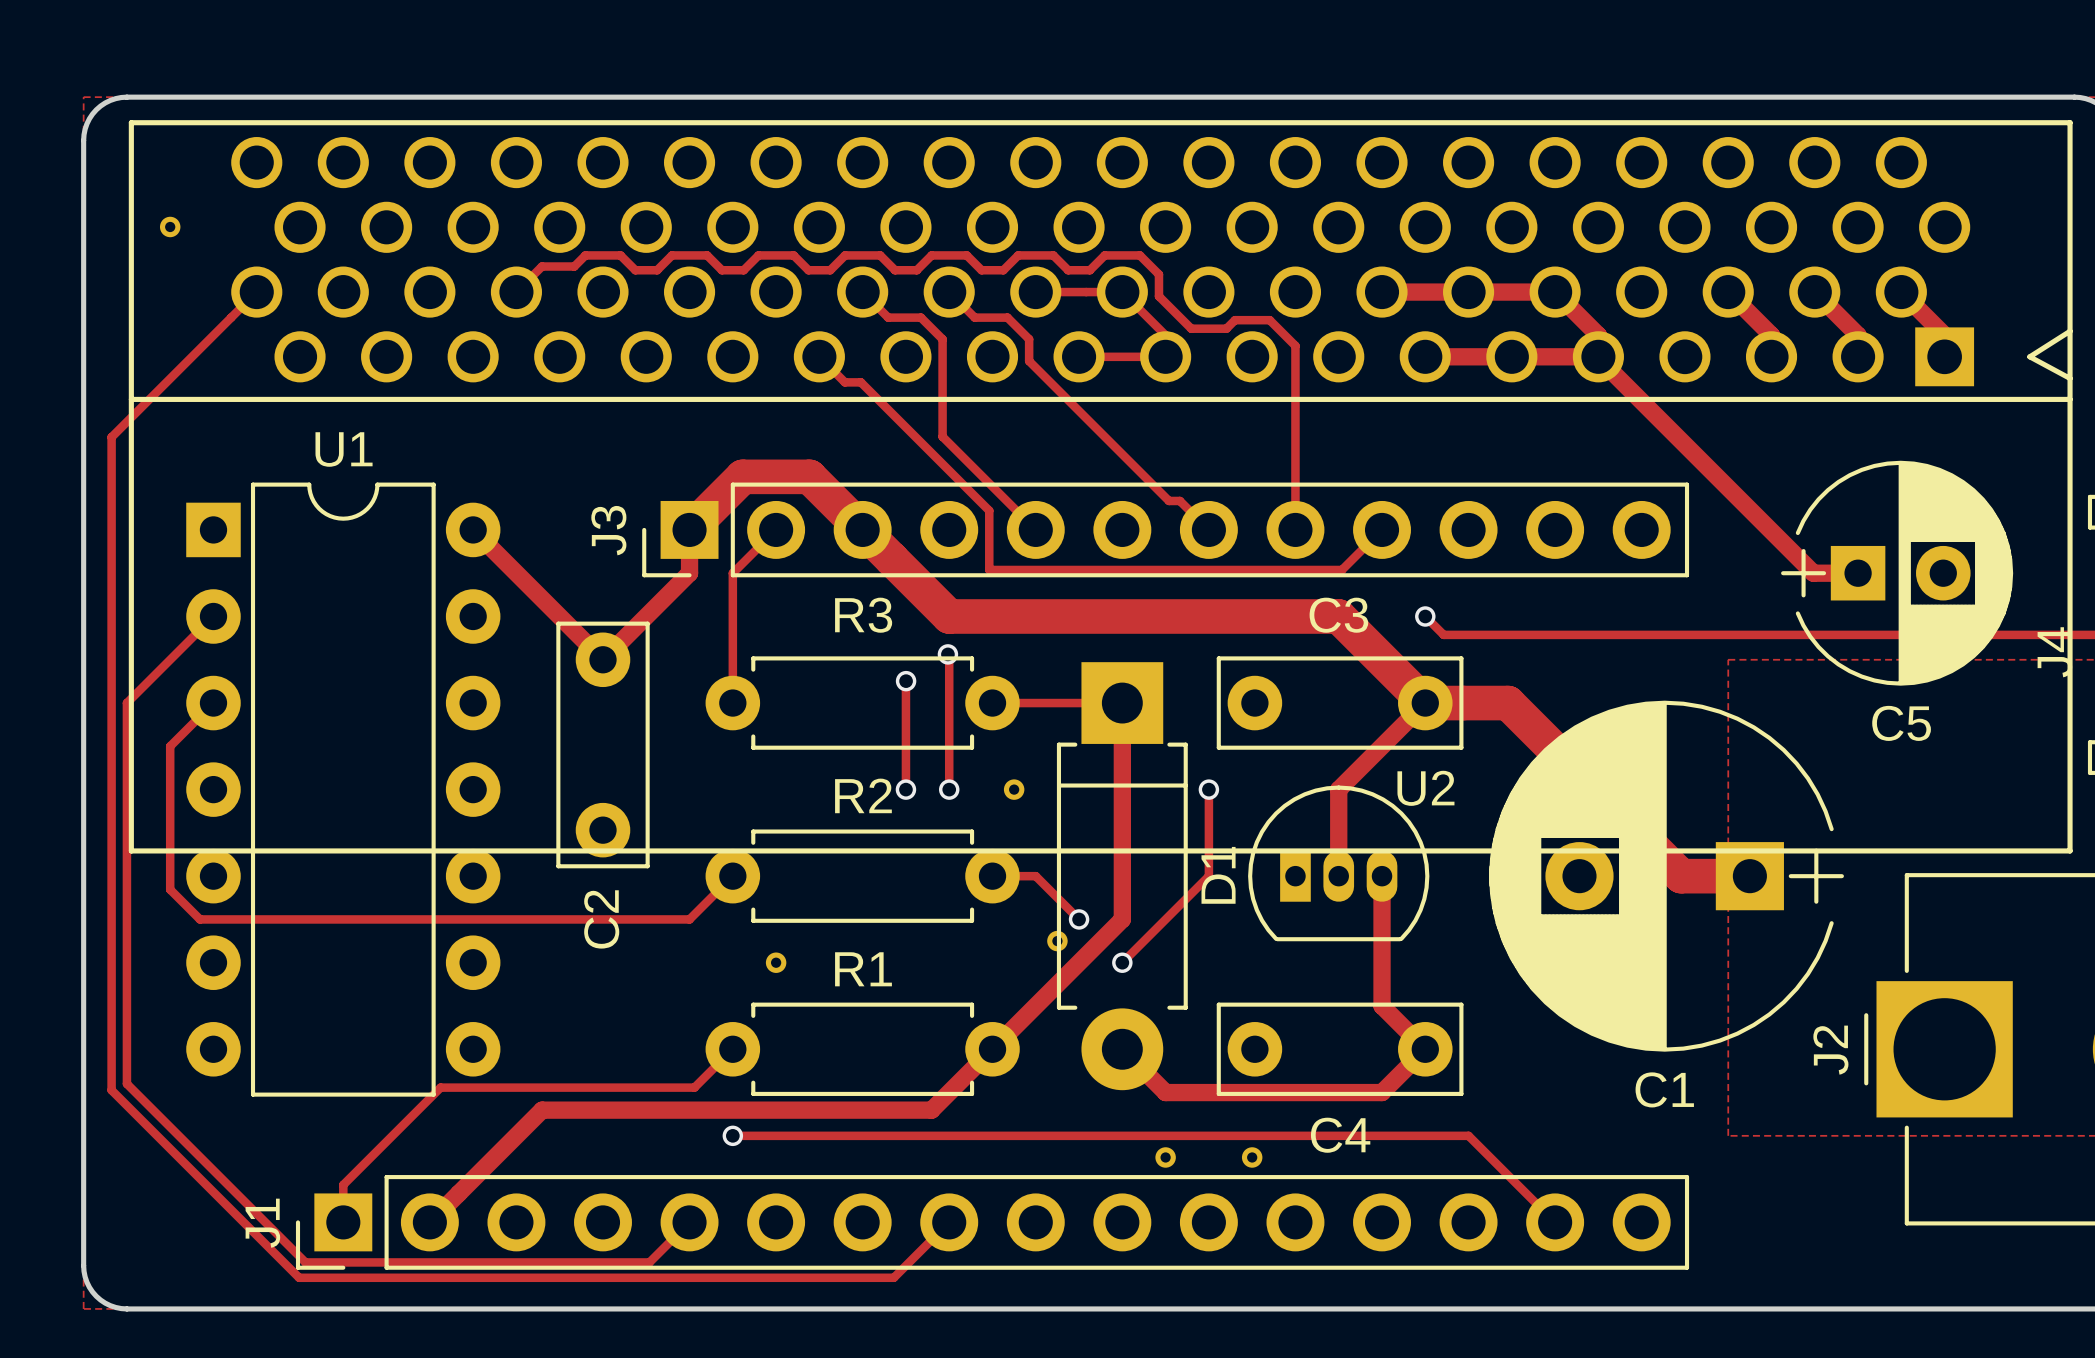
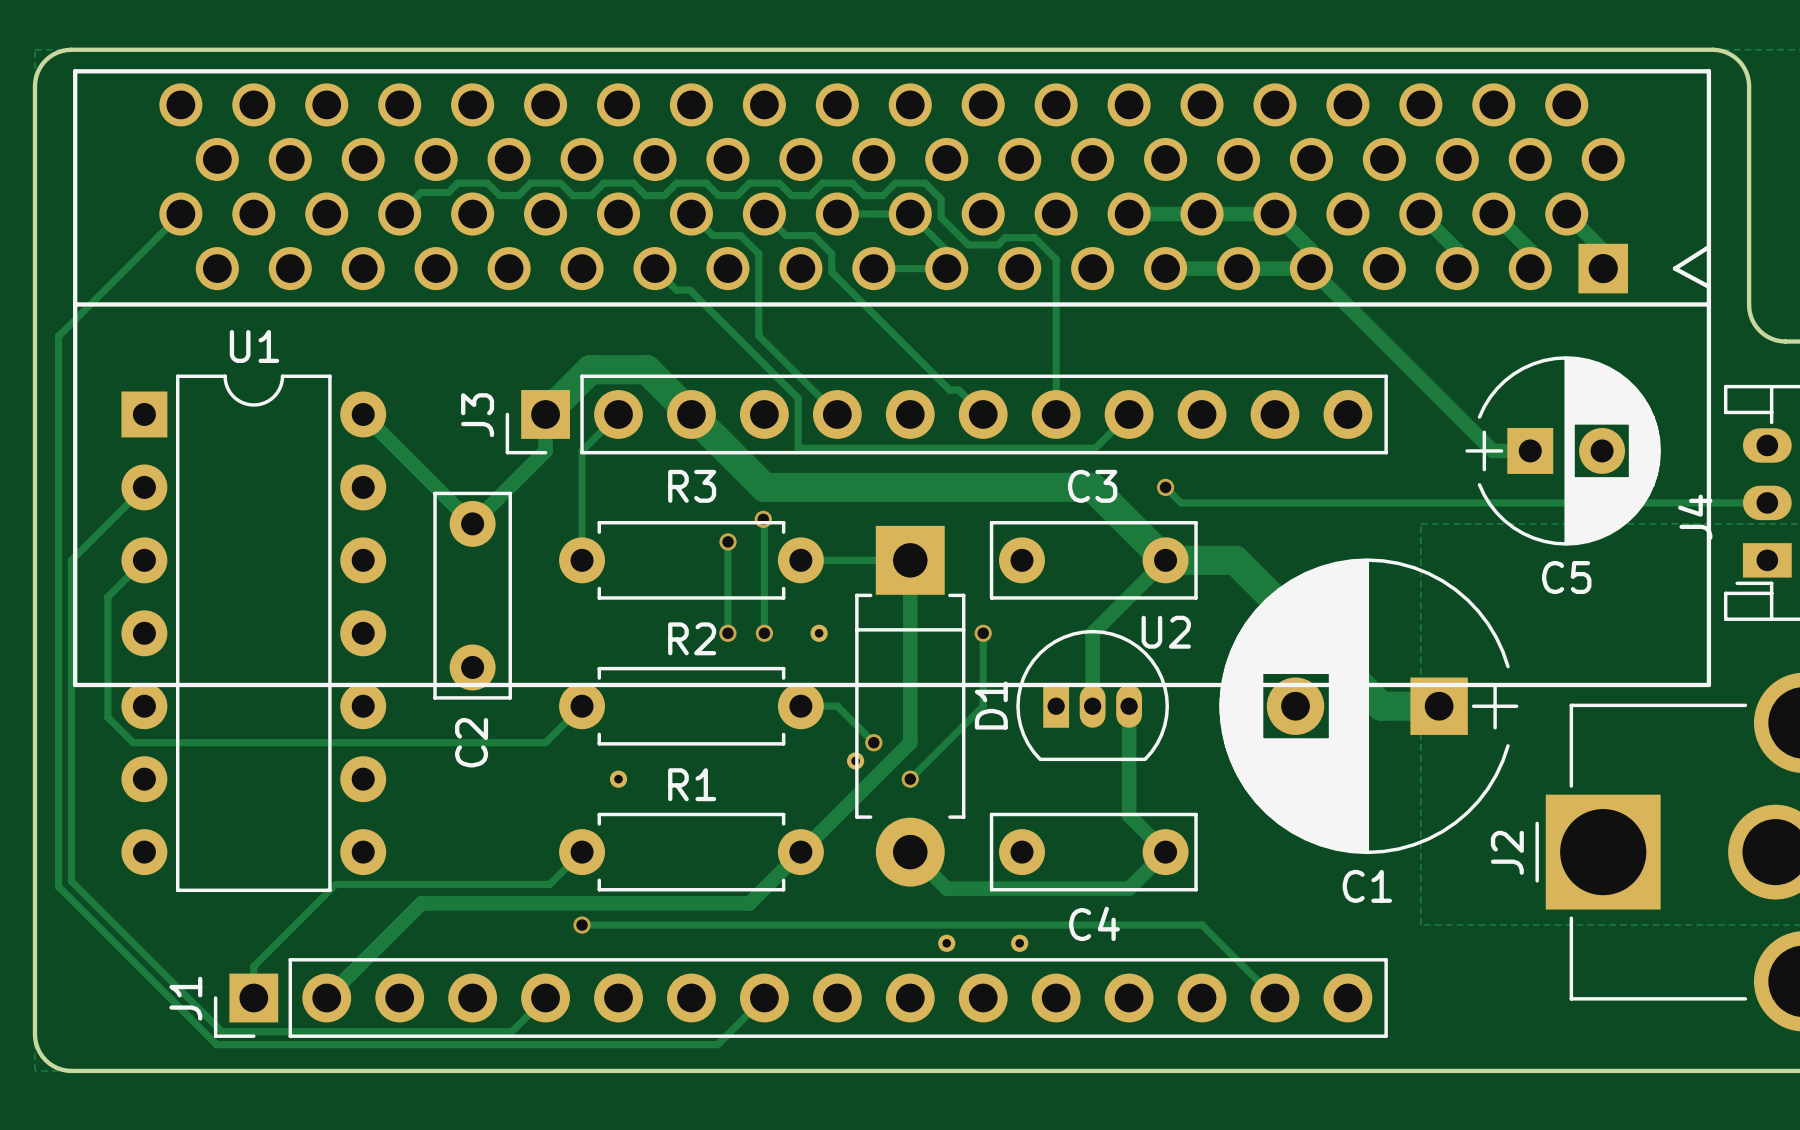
part: (170, 226) -> none

